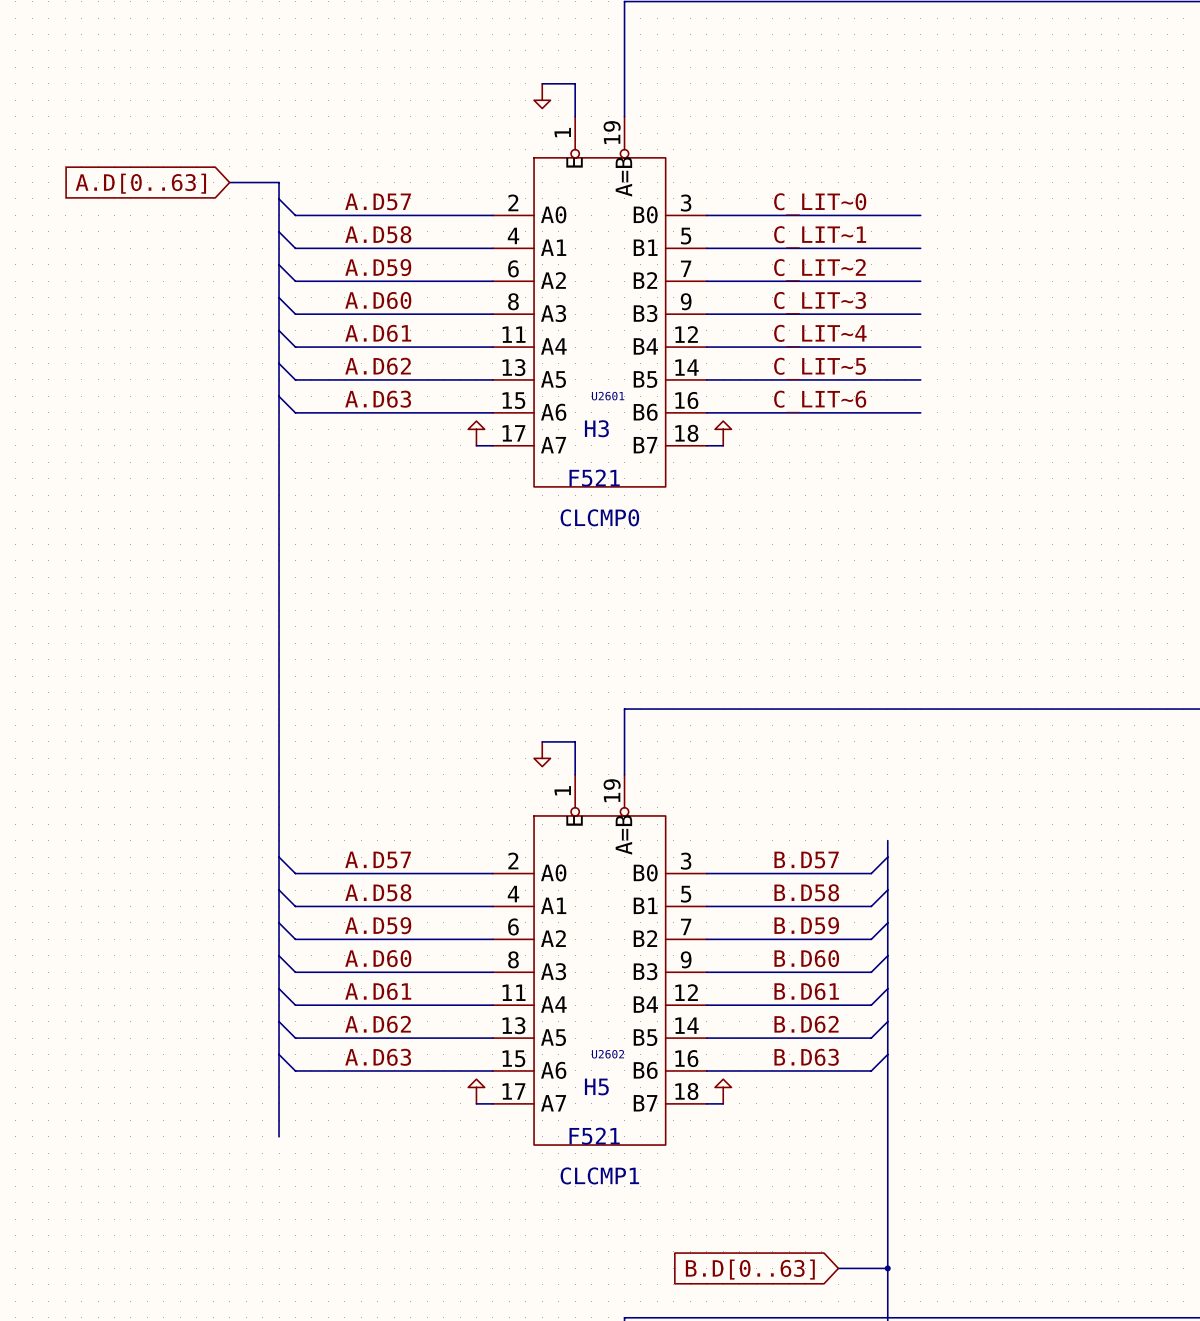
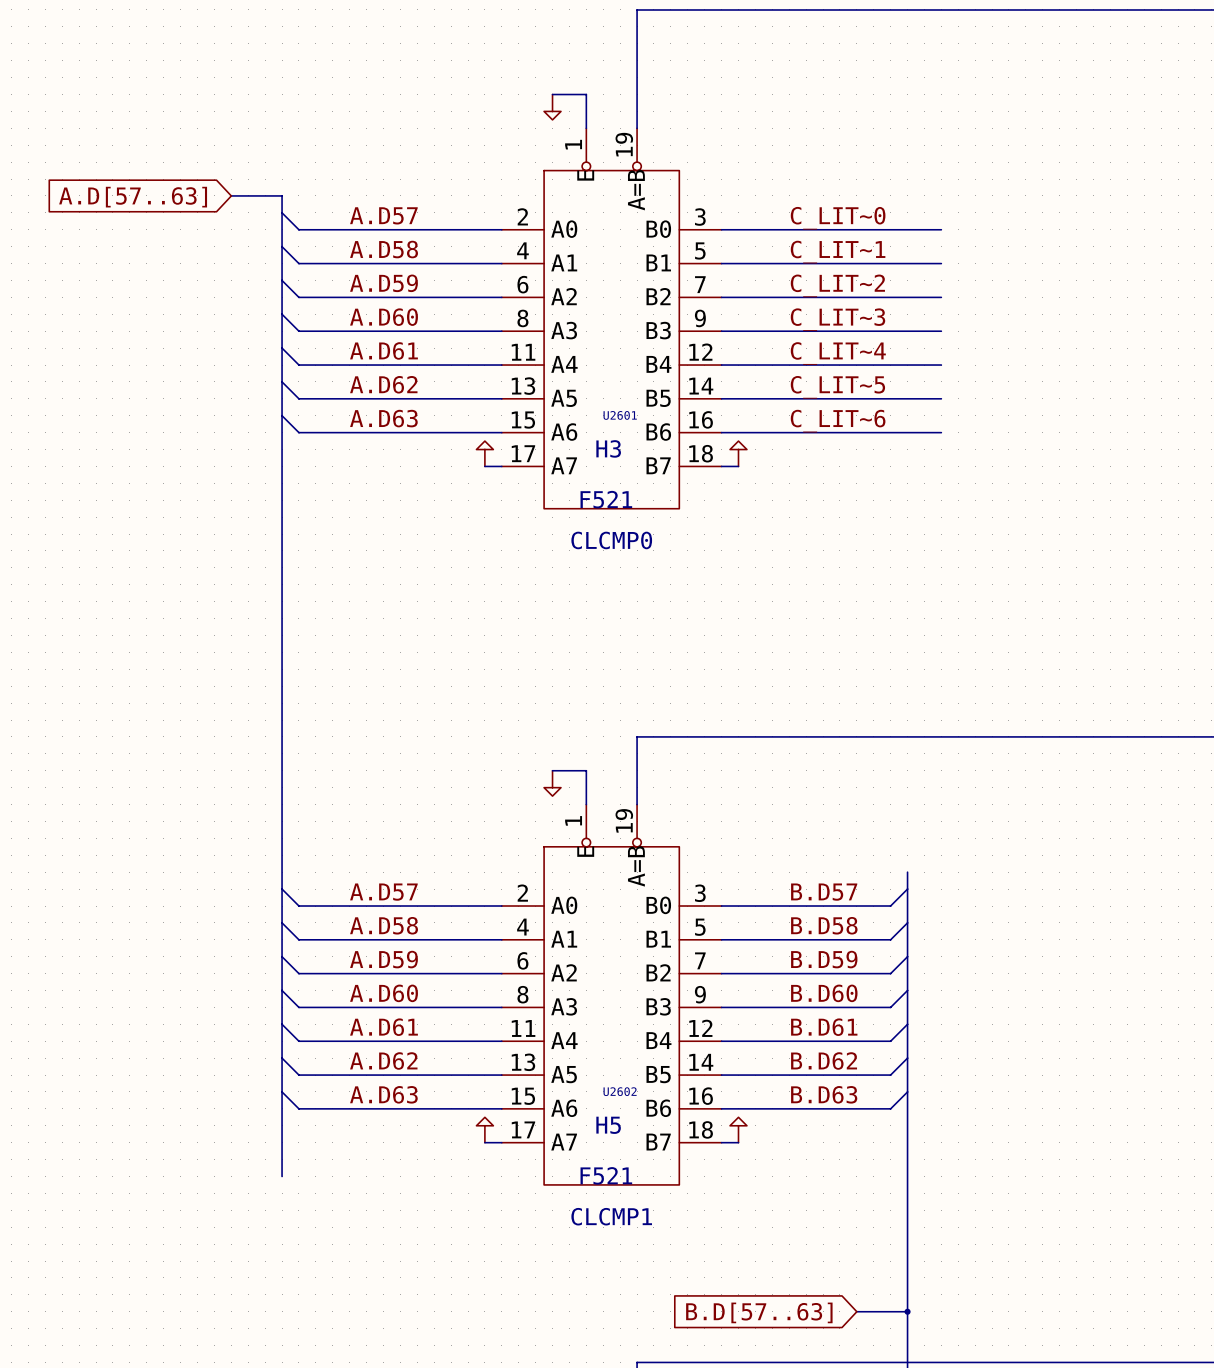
global label: A.D[0..63] (140, 183) -> A.D[57..63] (133, 197)
global label: B.D[0..63] (750, 1269) -> B.D[57..63] (759, 1312)

